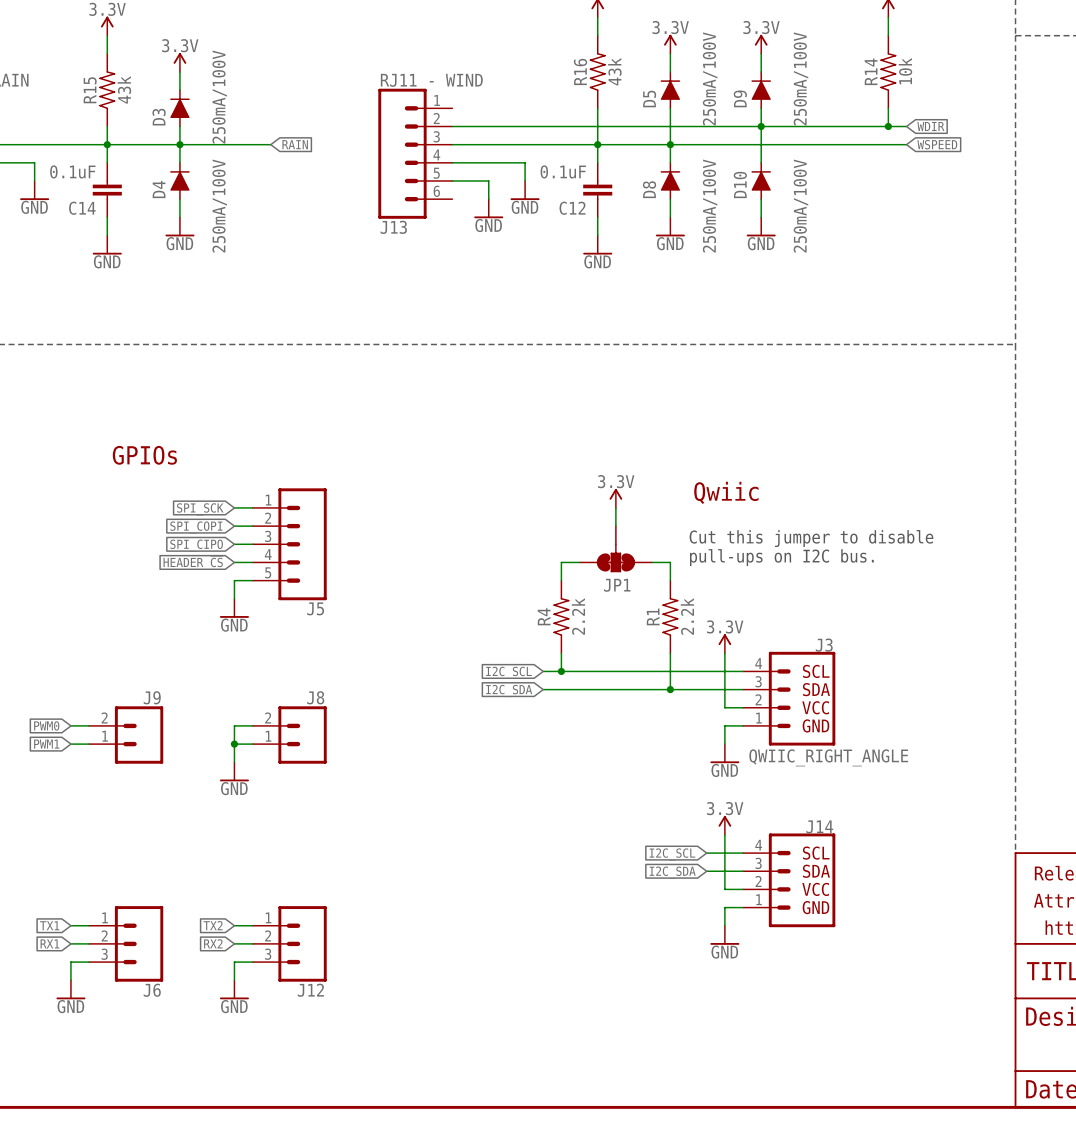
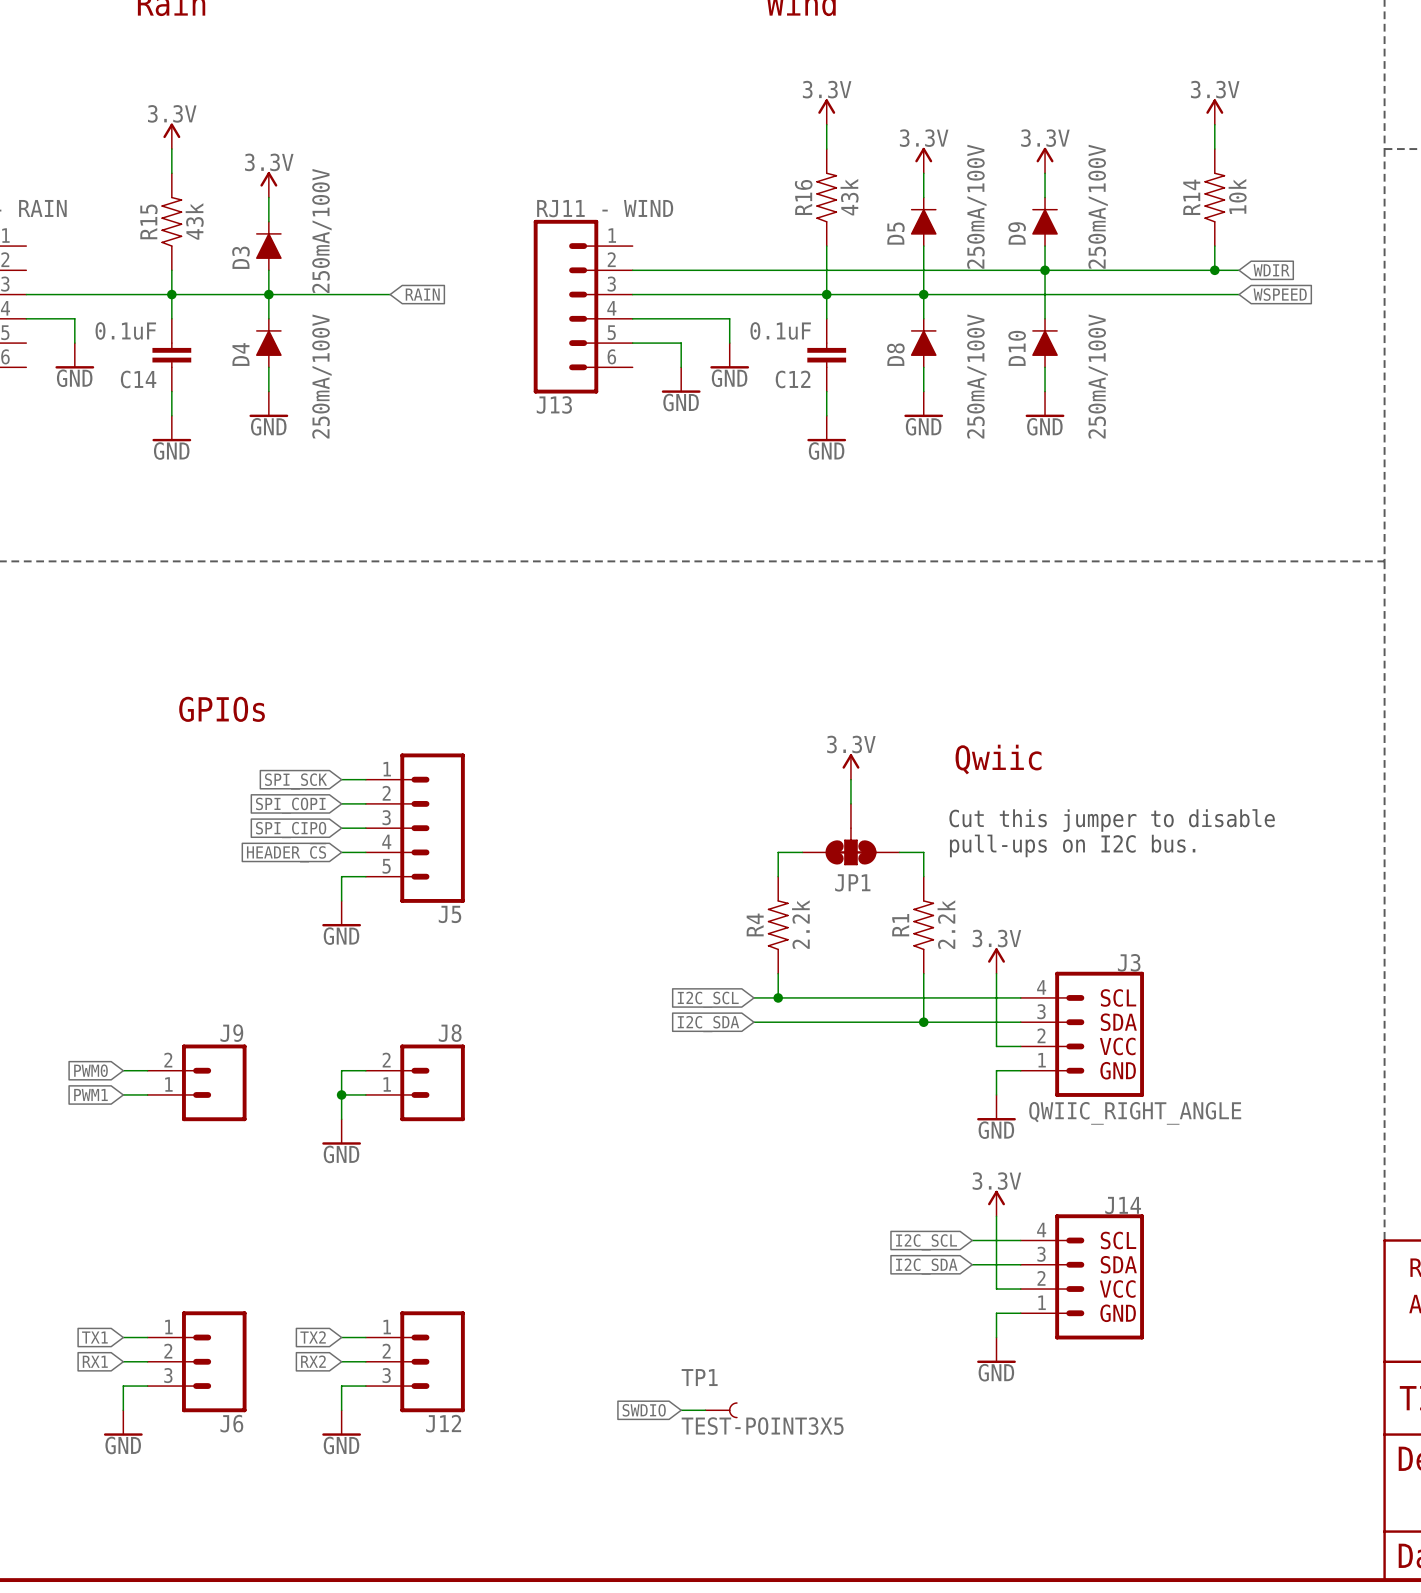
global label: none -> SWDIO (644, 1410)
wire: none -> (681, 1410) (705, 1410)
TP1: none -> TEST-POINT3X5 (721, 1410)

